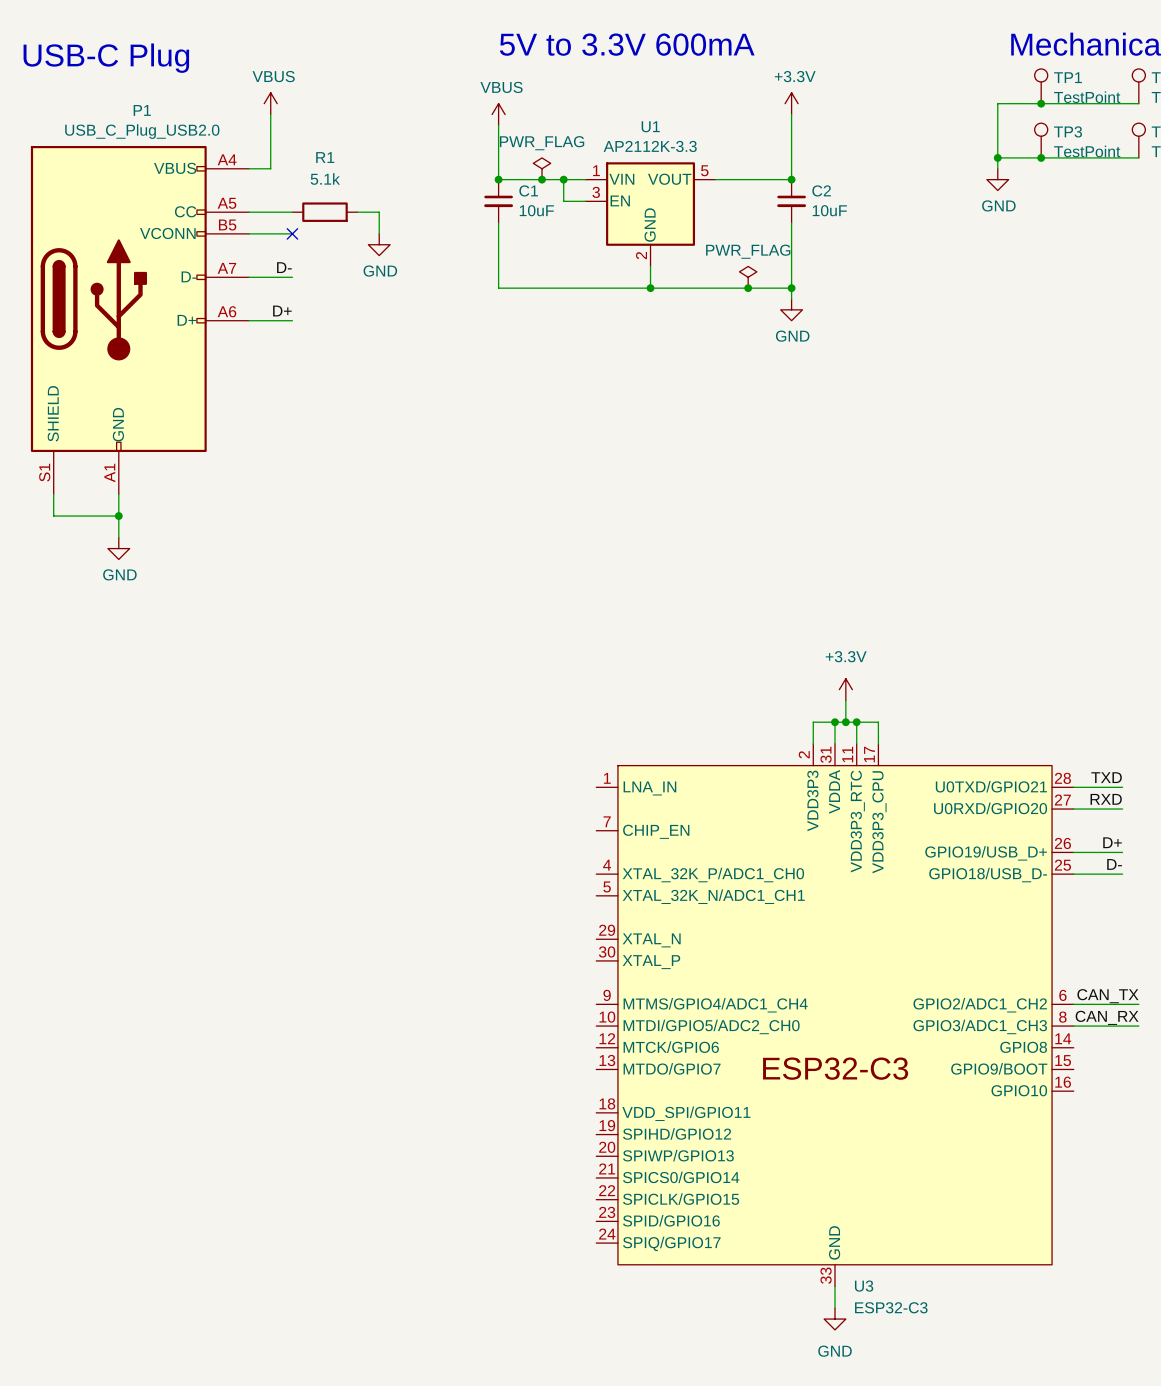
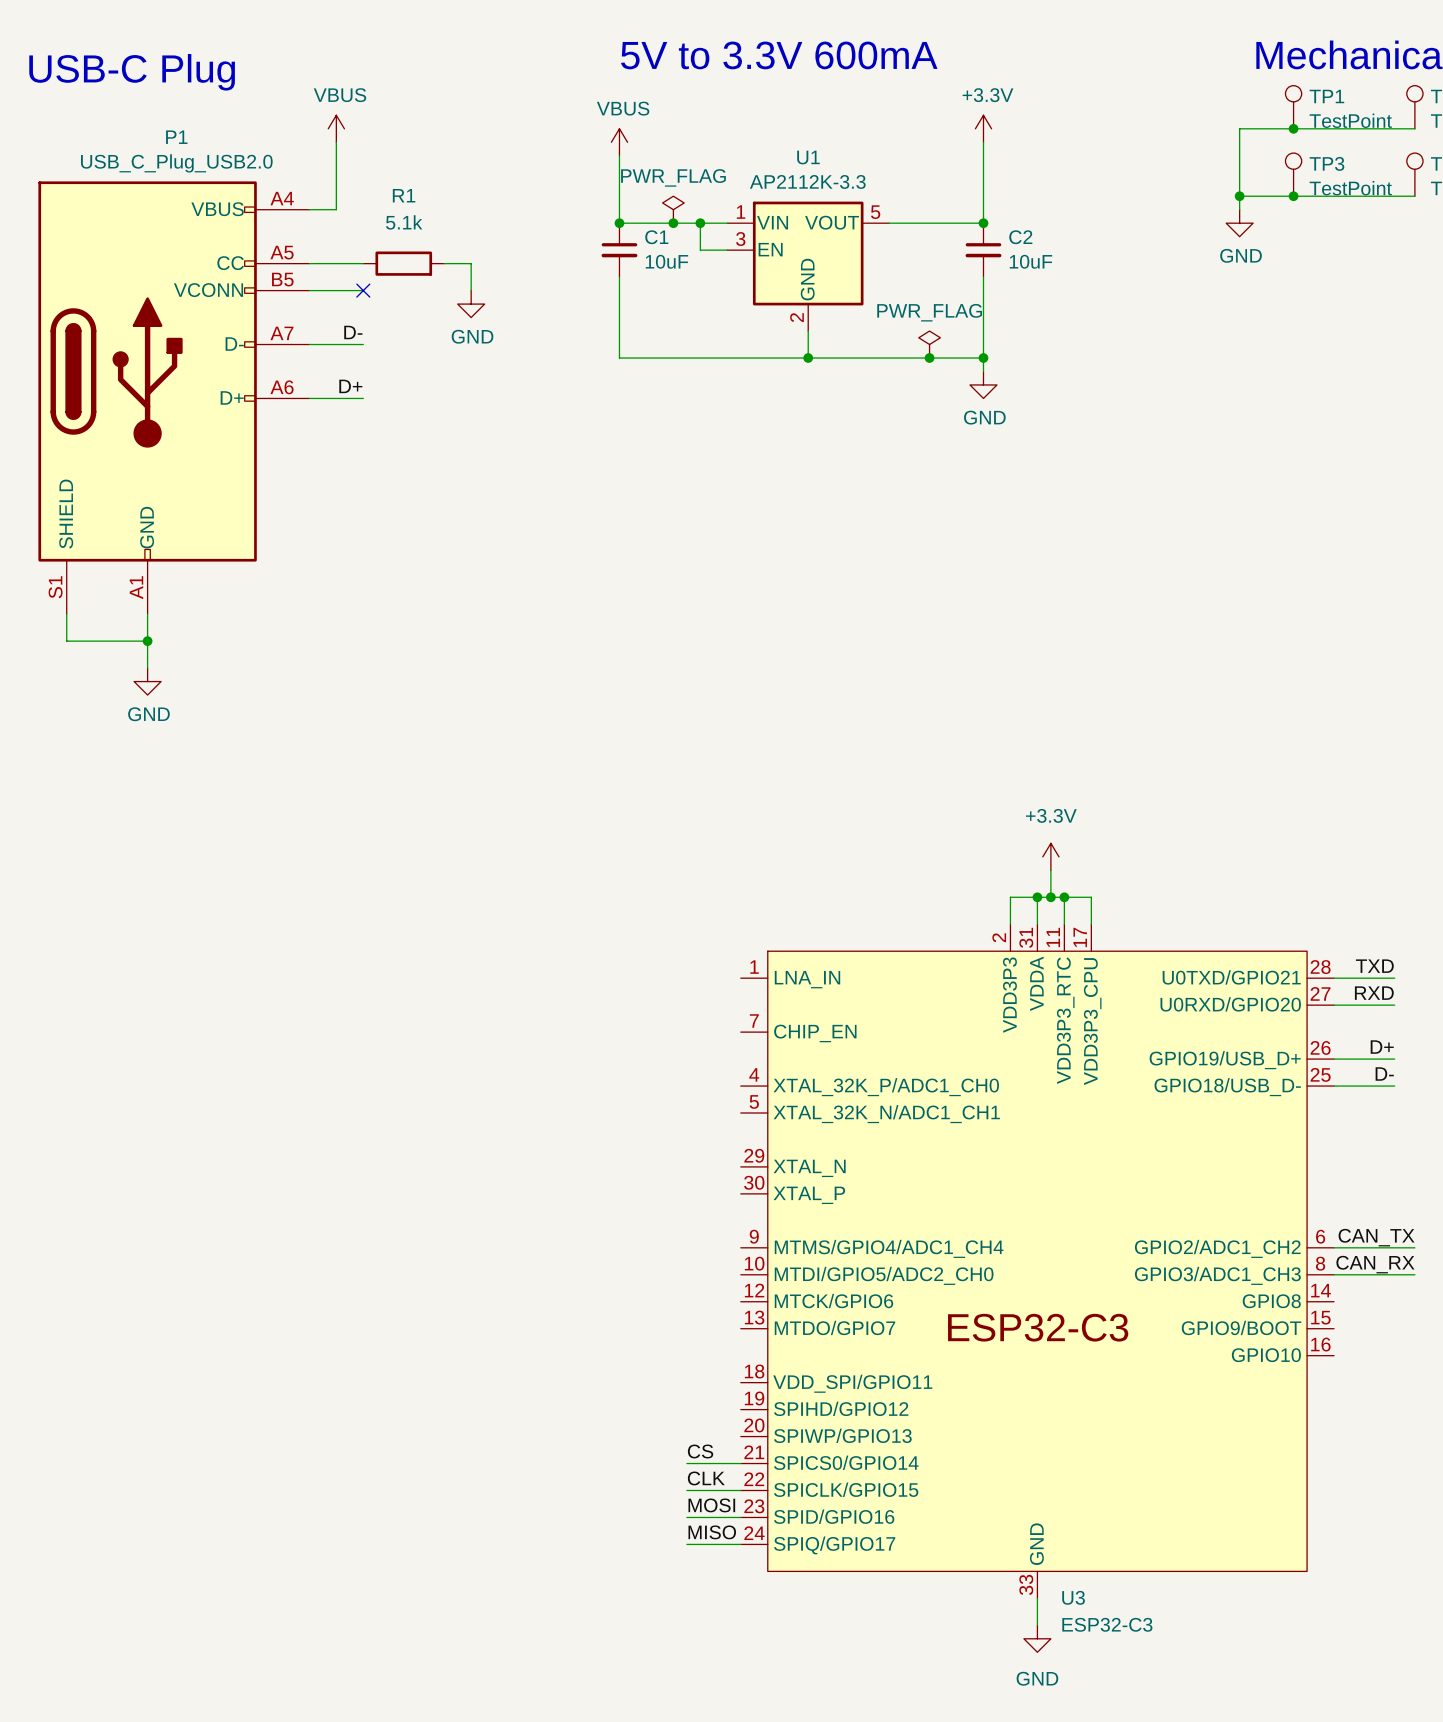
label: none -> CS (700, 1451)
wire: none -> (686, 1463) (740, 1463)
label: none -> CLK (706, 1478)
wire: none -> (686, 1490) (740, 1490)
label: none -> MOSI (711, 1505)
wire: none -> (686, 1517) (740, 1517)
label: none -> MISO (712, 1532)
wire: none -> (686, 1544) (740, 1544)

